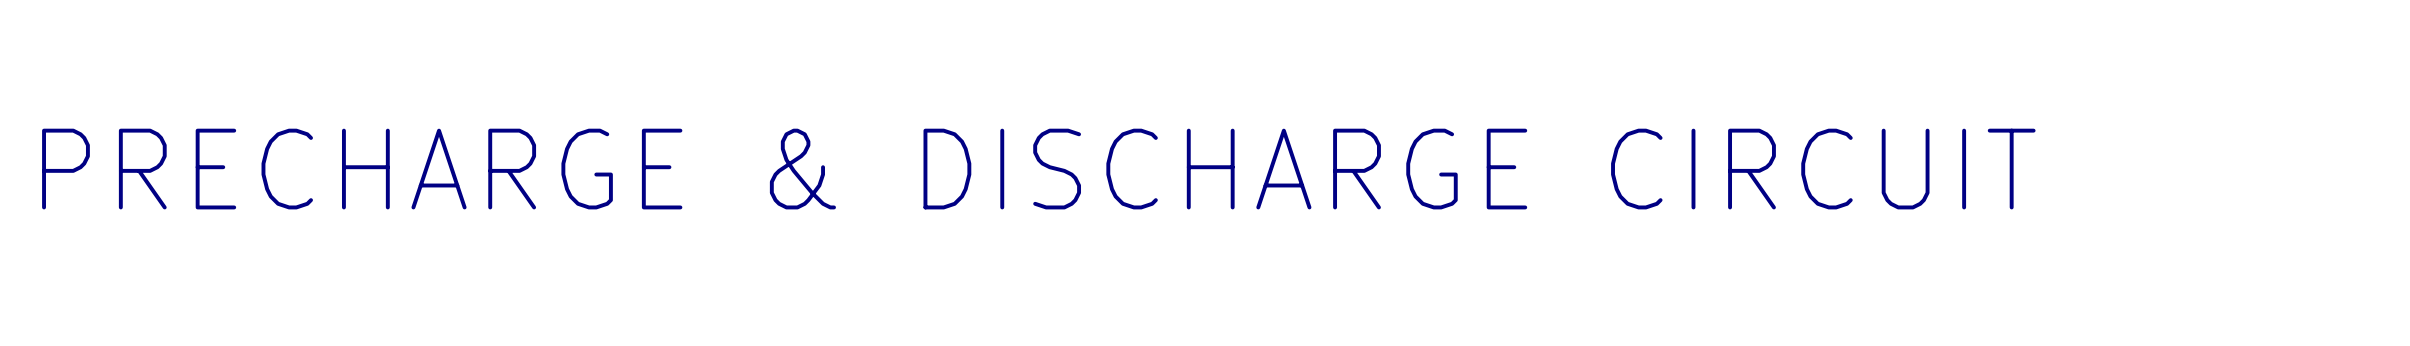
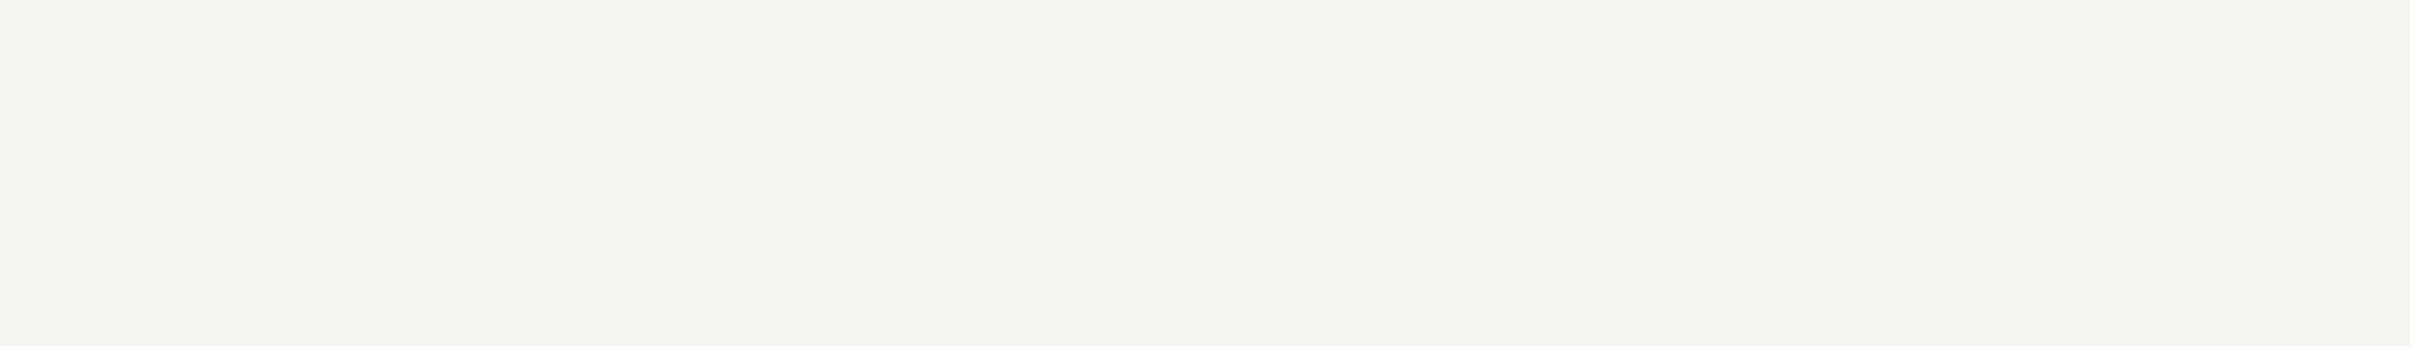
text: PRECHARGE & DISCHARGE CIRCUIT (1038, 169) -> none

